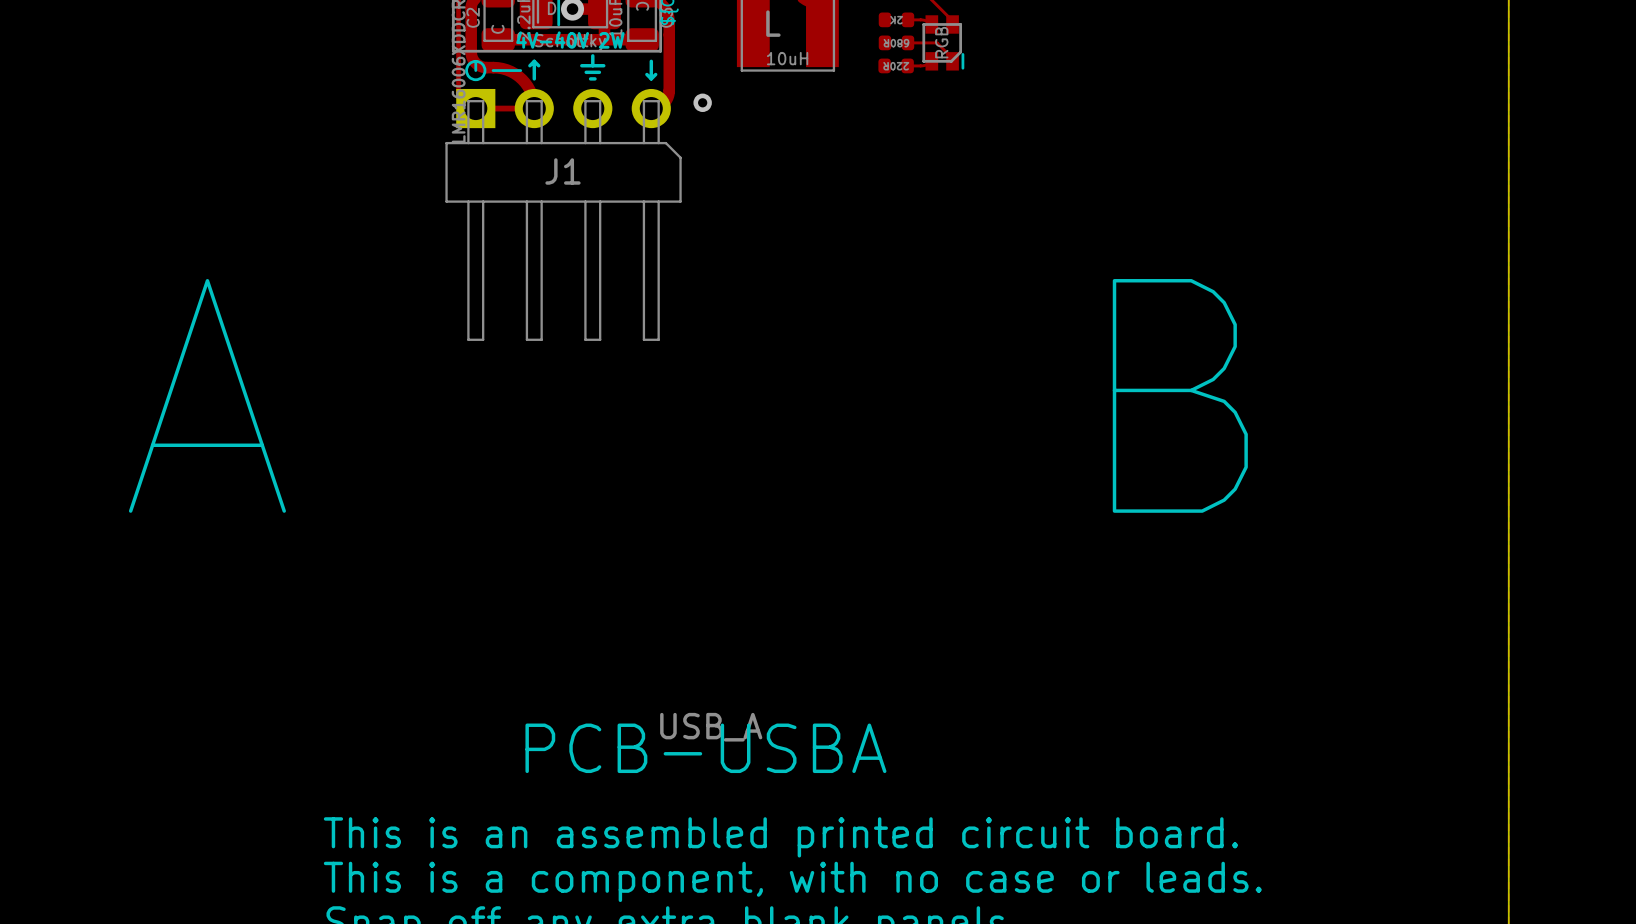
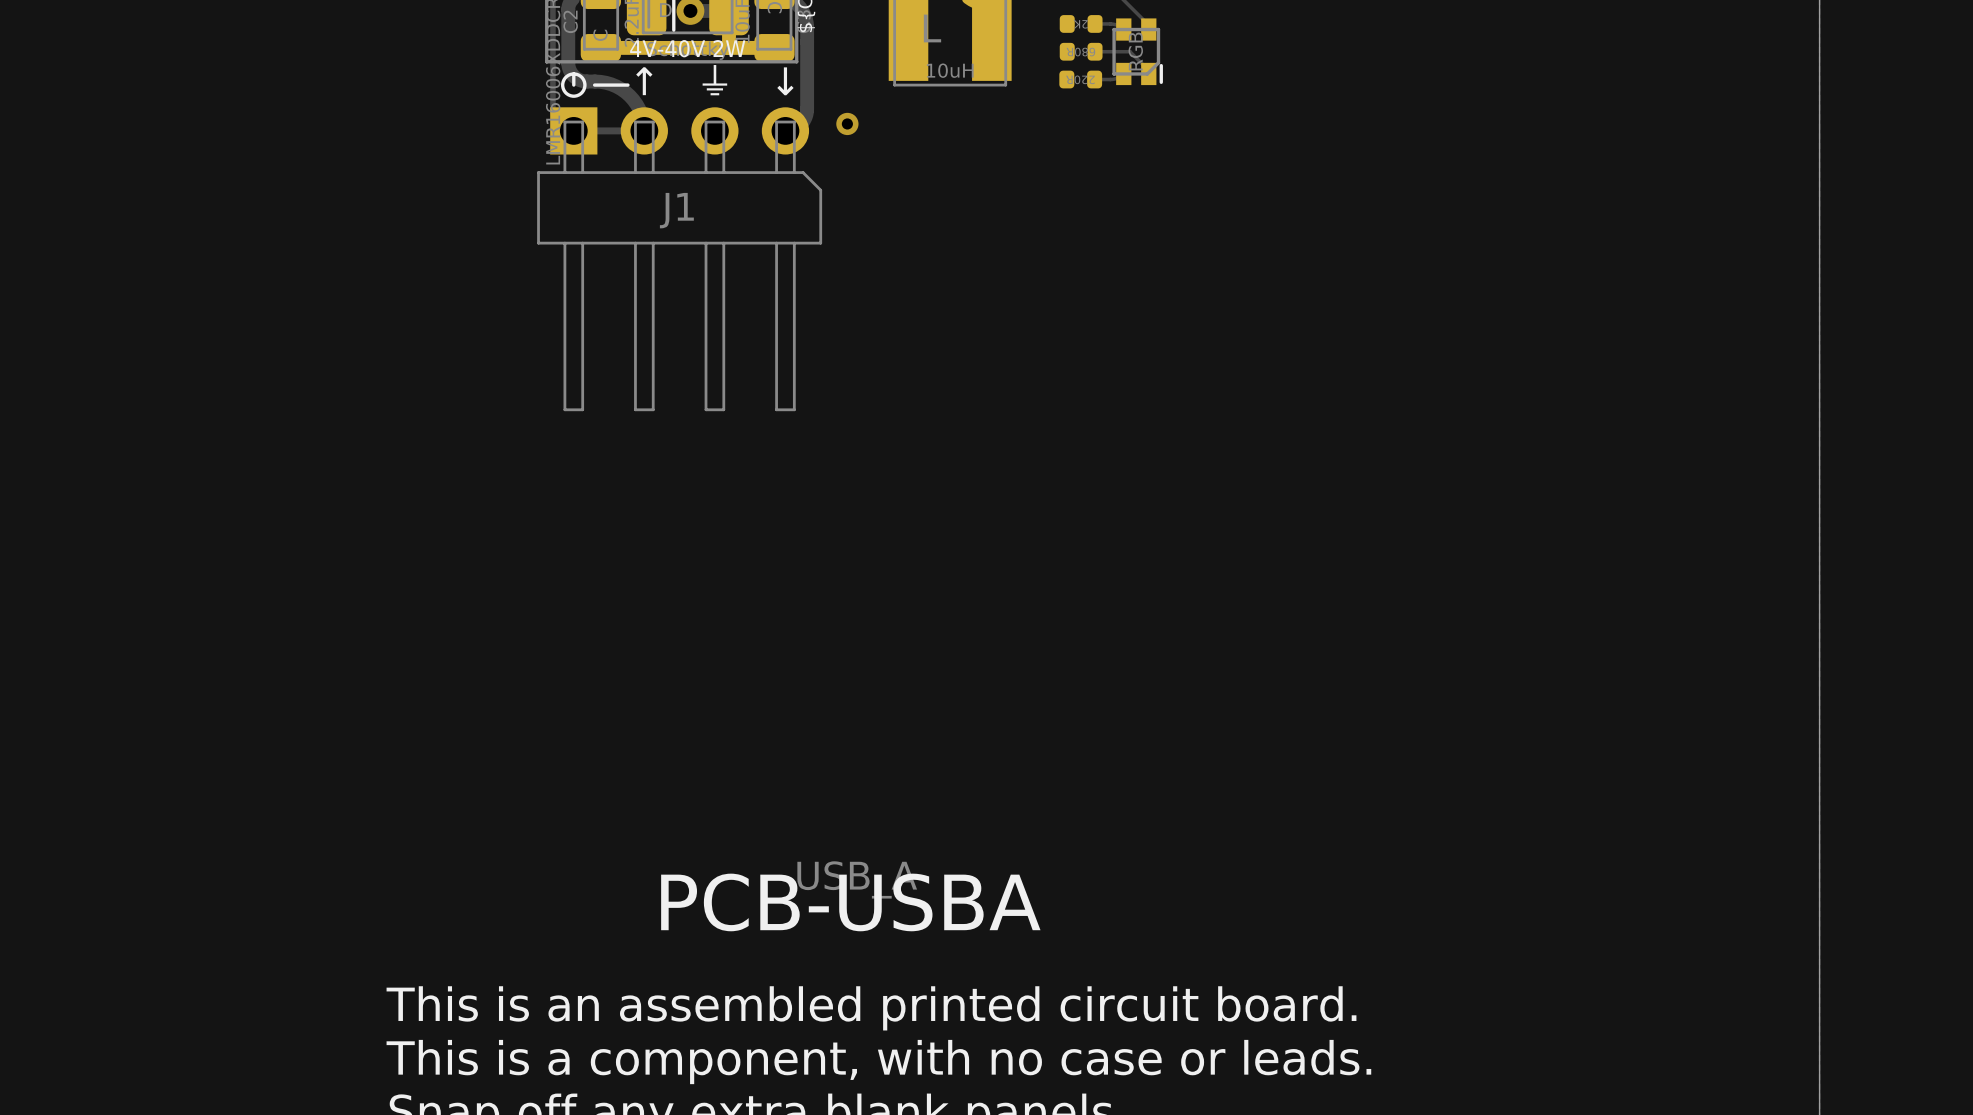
text: A (207, 395) -> none
text: B (1180, 395) -> none

